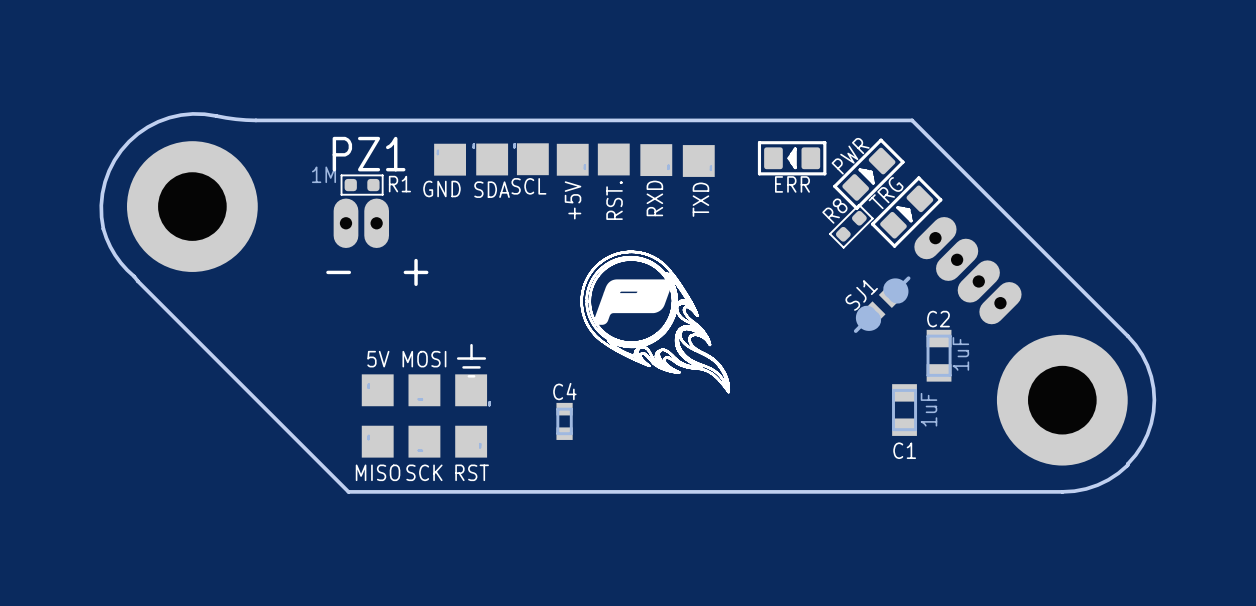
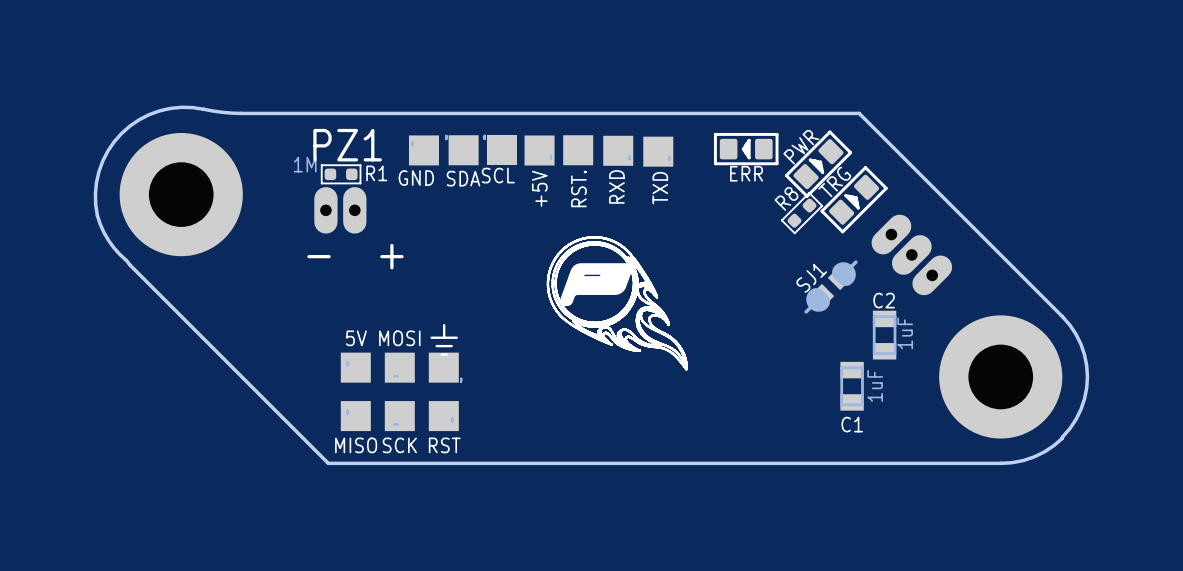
part footprint: [914, 217, 1022, 325] -> [871, 214, 953, 296]
C4: (564, 421) -> none

